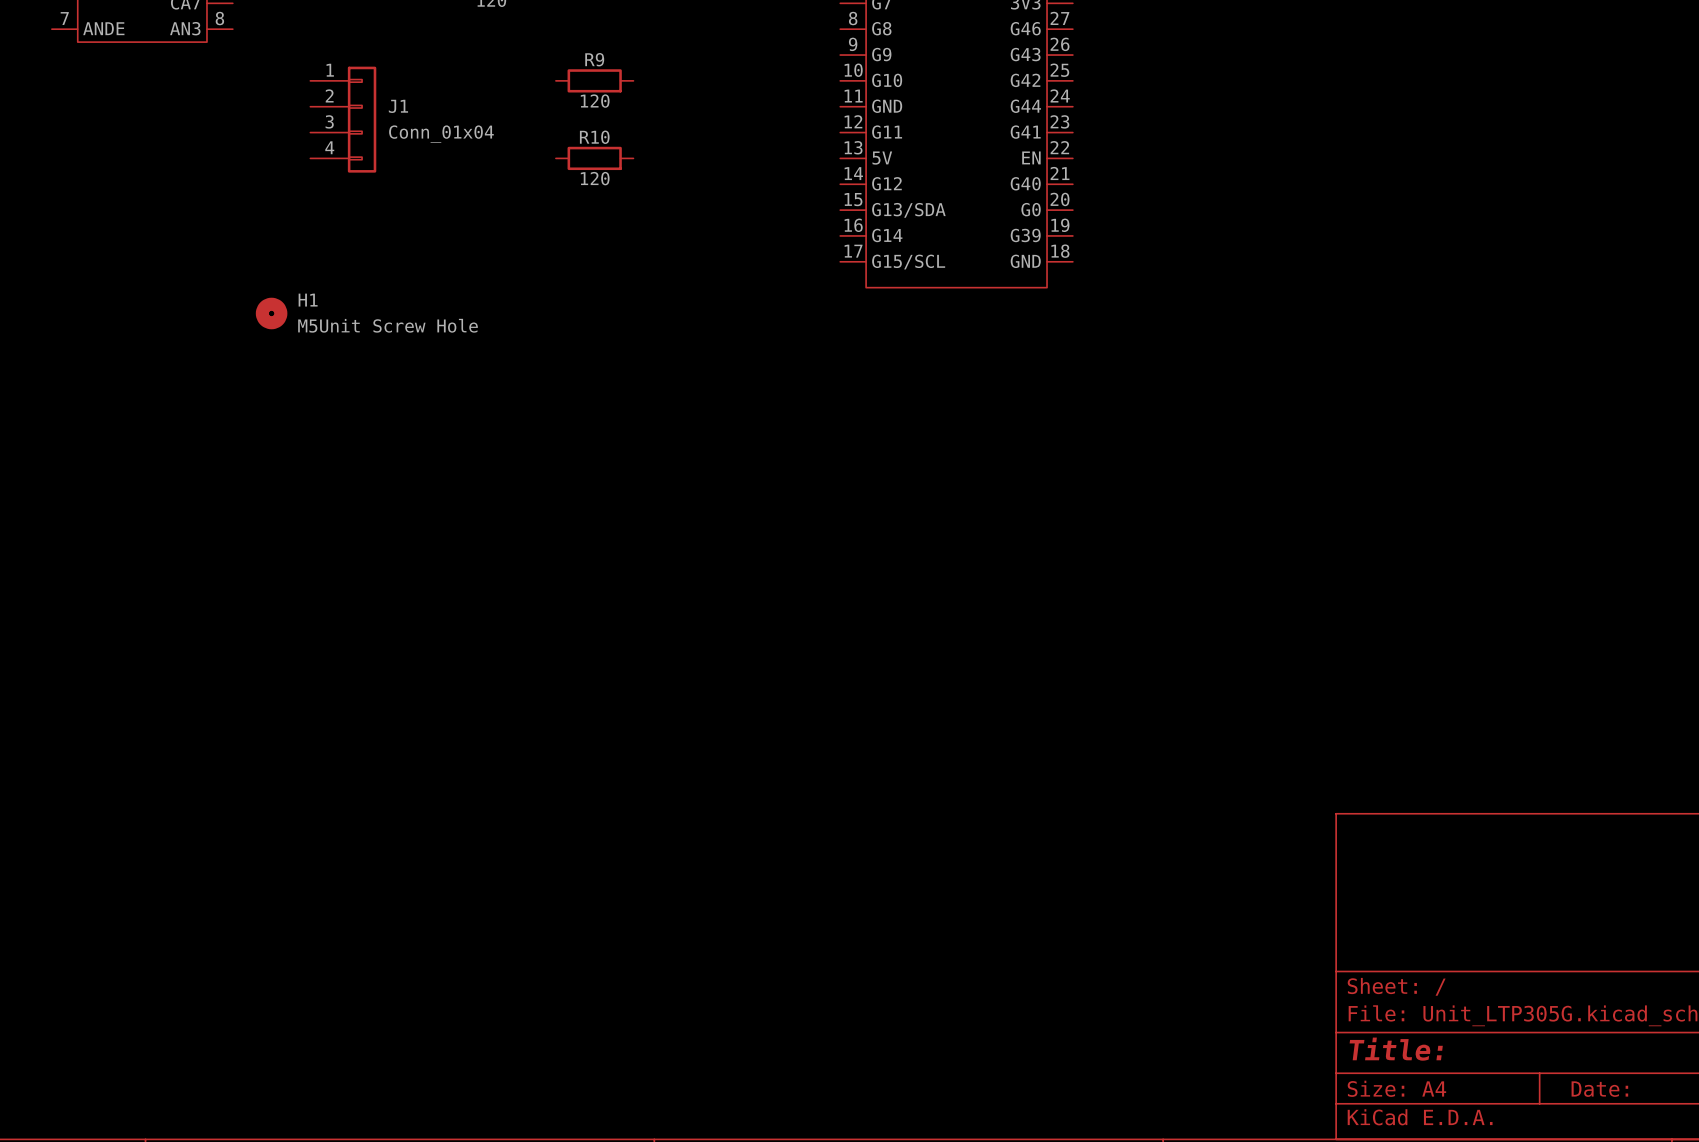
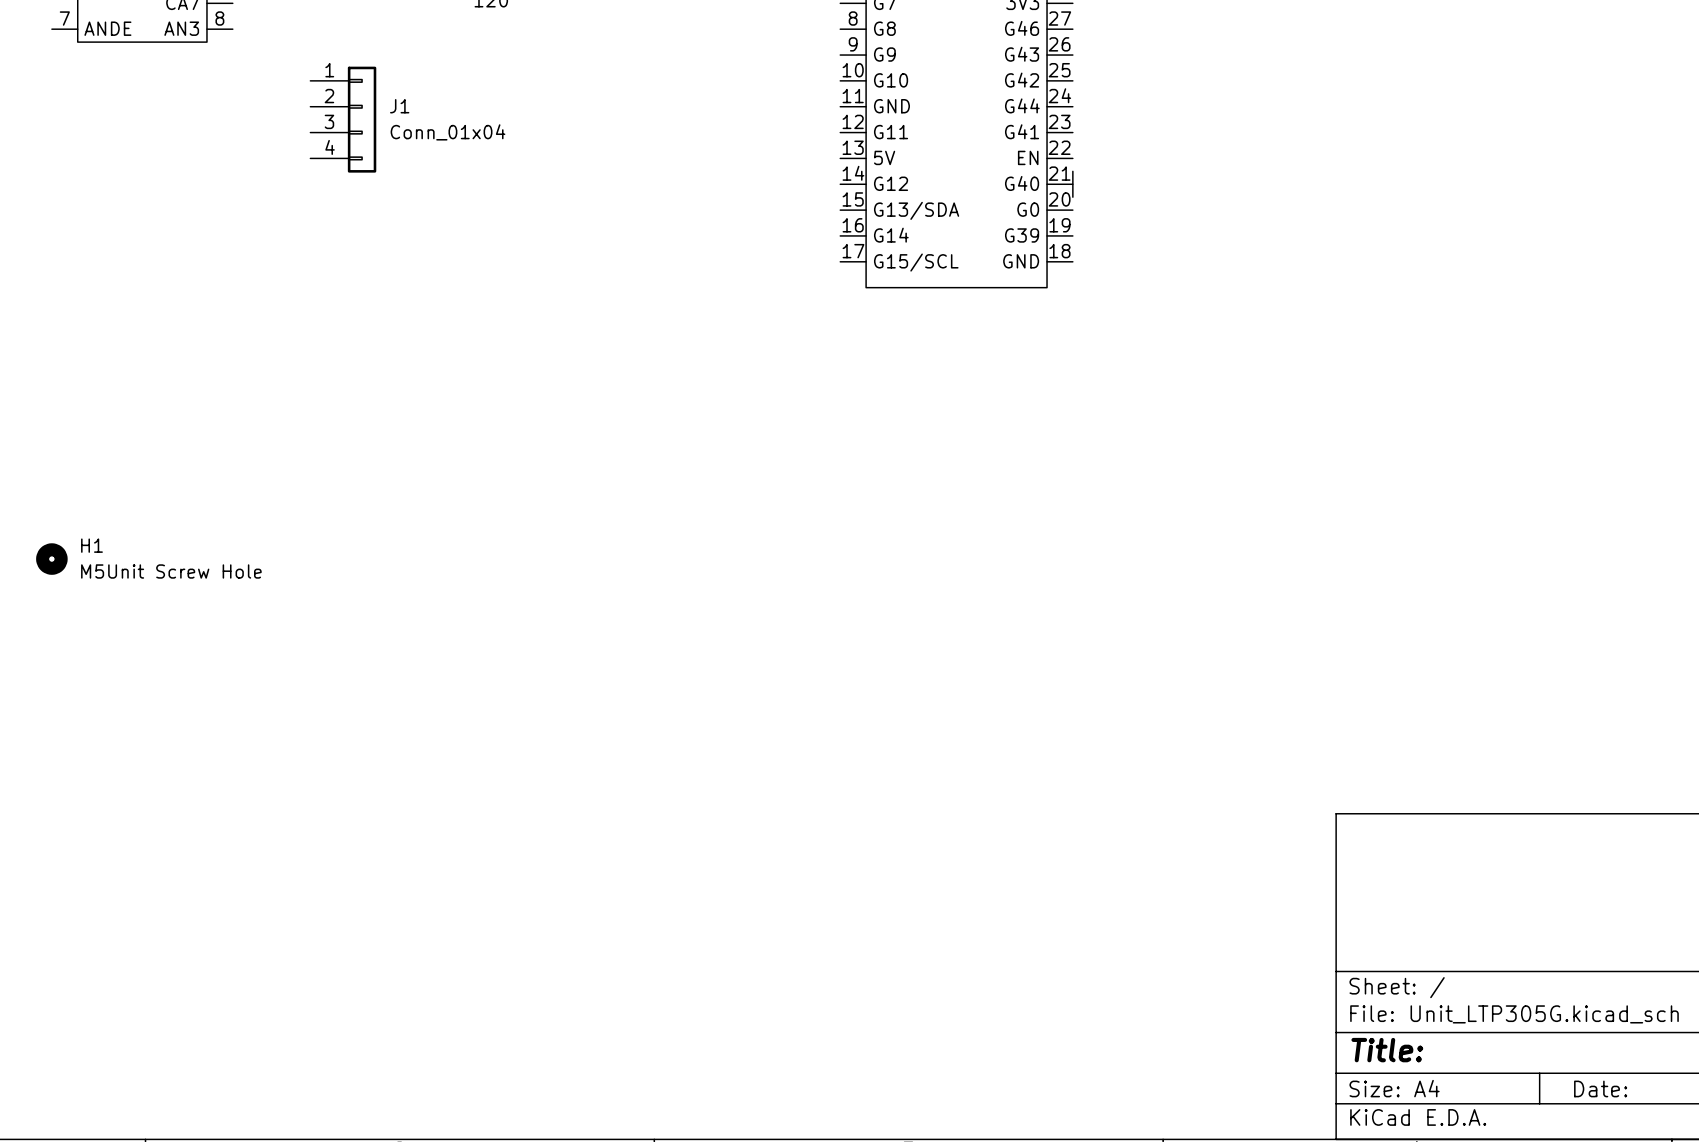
R9: 120 (594, 80) -> none
R10: 120 (594, 158) -> none
wire: none -> (1072, 171) (1072, 197)
H1 position: (271, 313) -> (51, 559)

